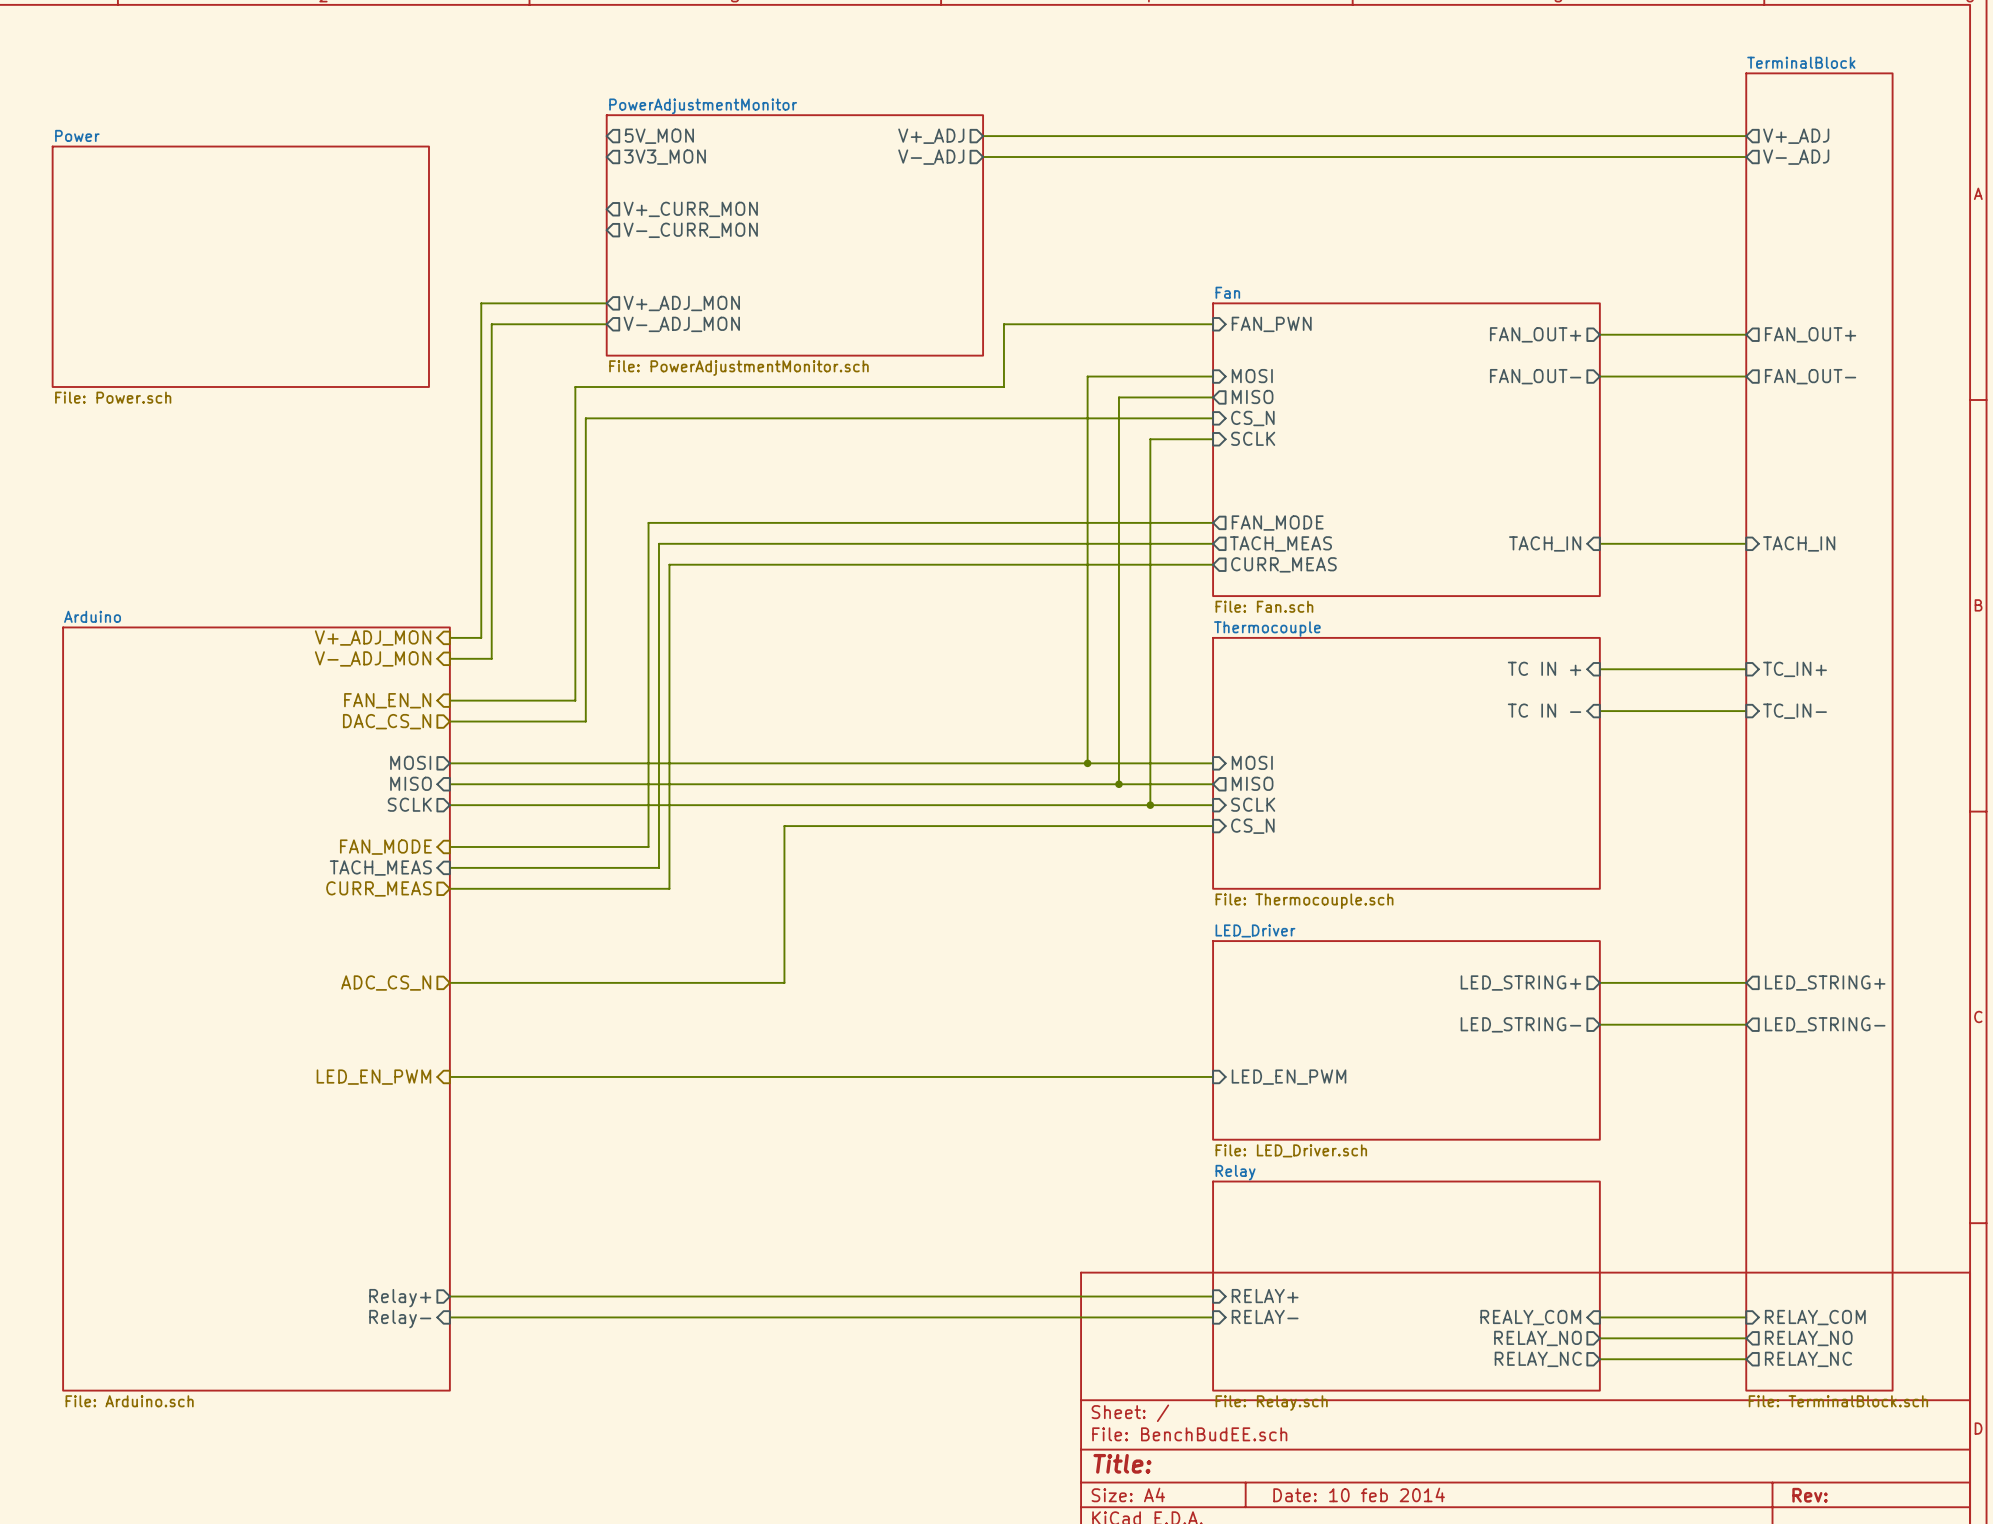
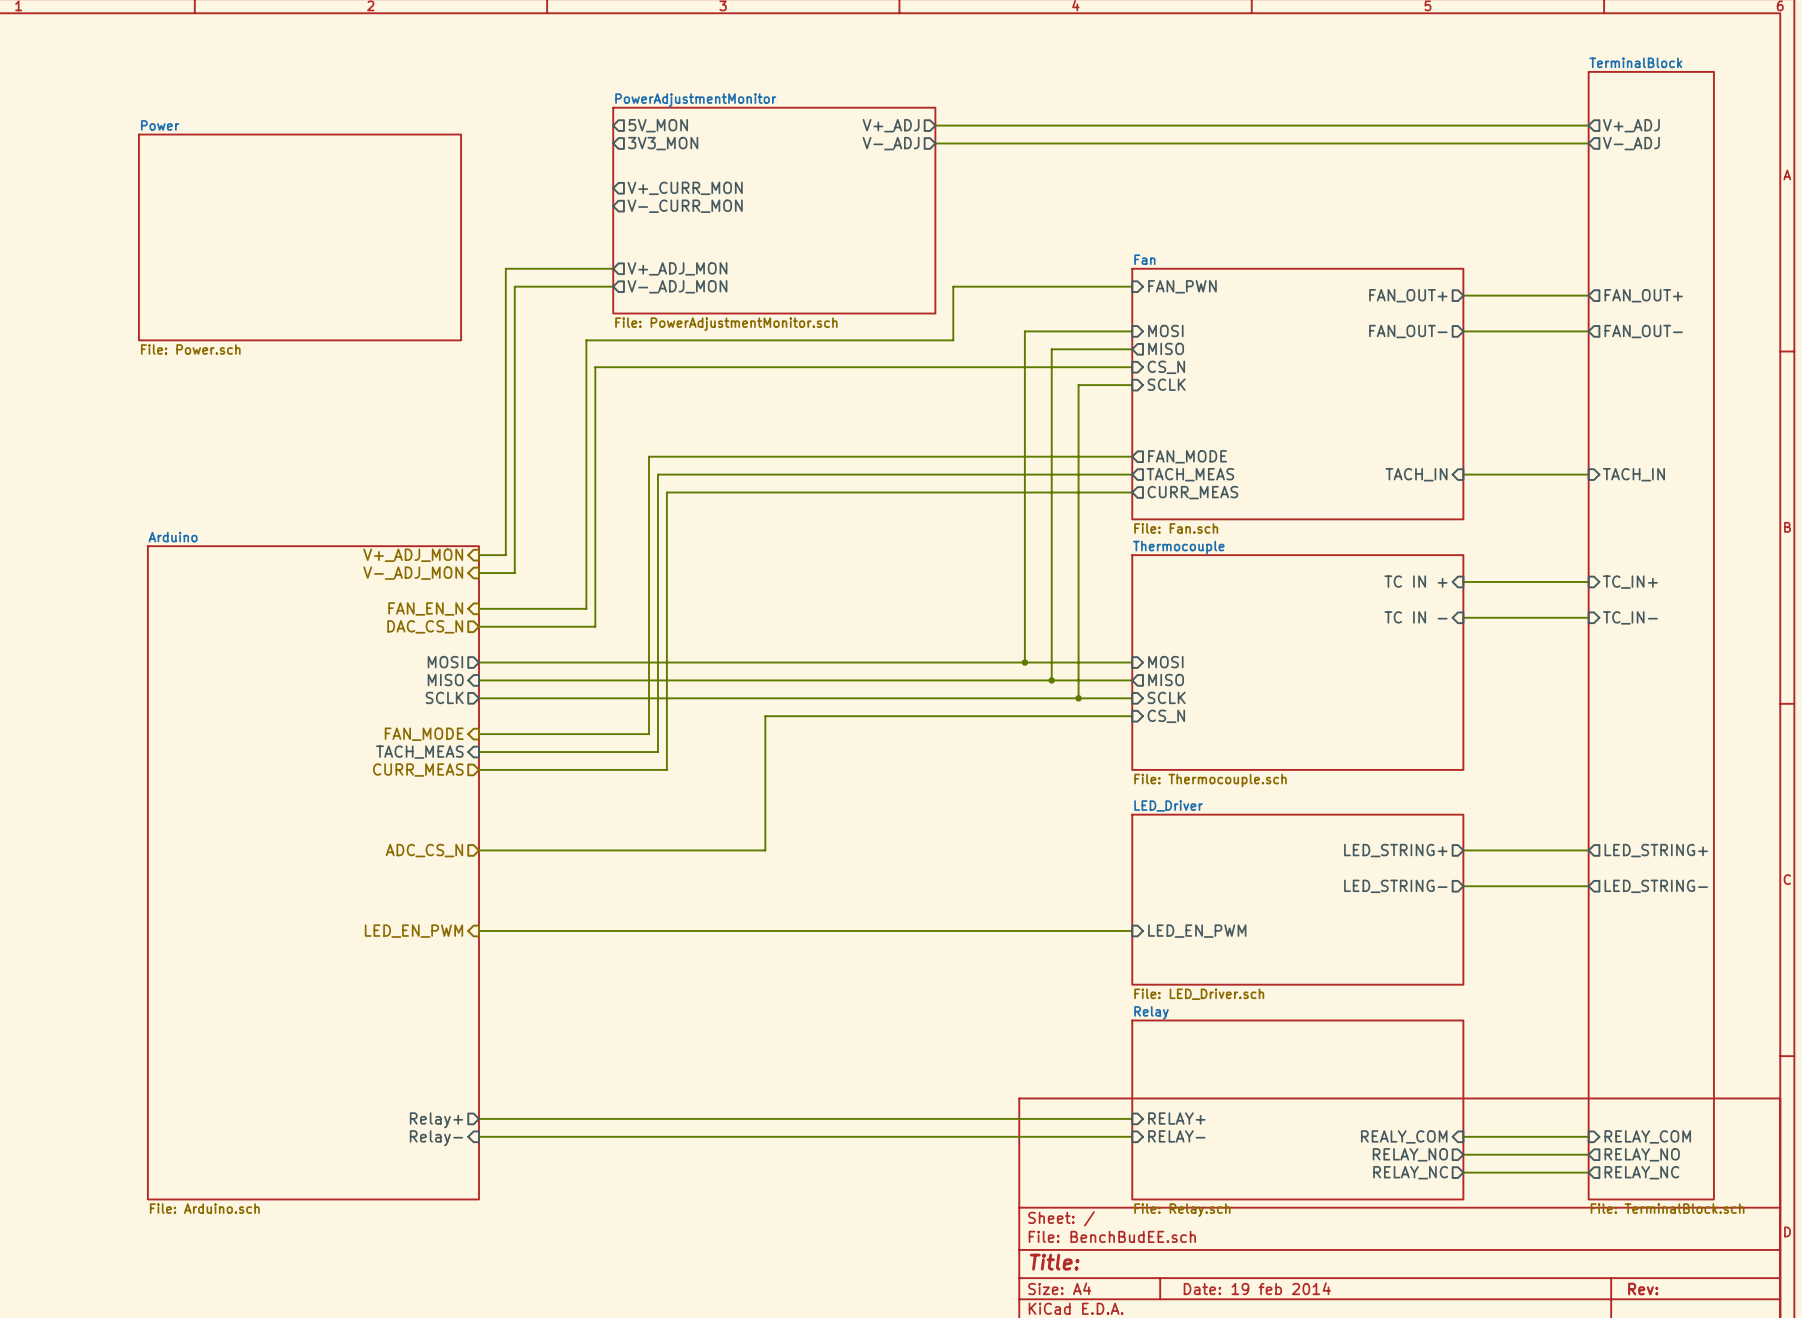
title block: Date: 10 feb 2014 (1359, 1494) -> Date: 19 feb 2014 (1257, 1288)

